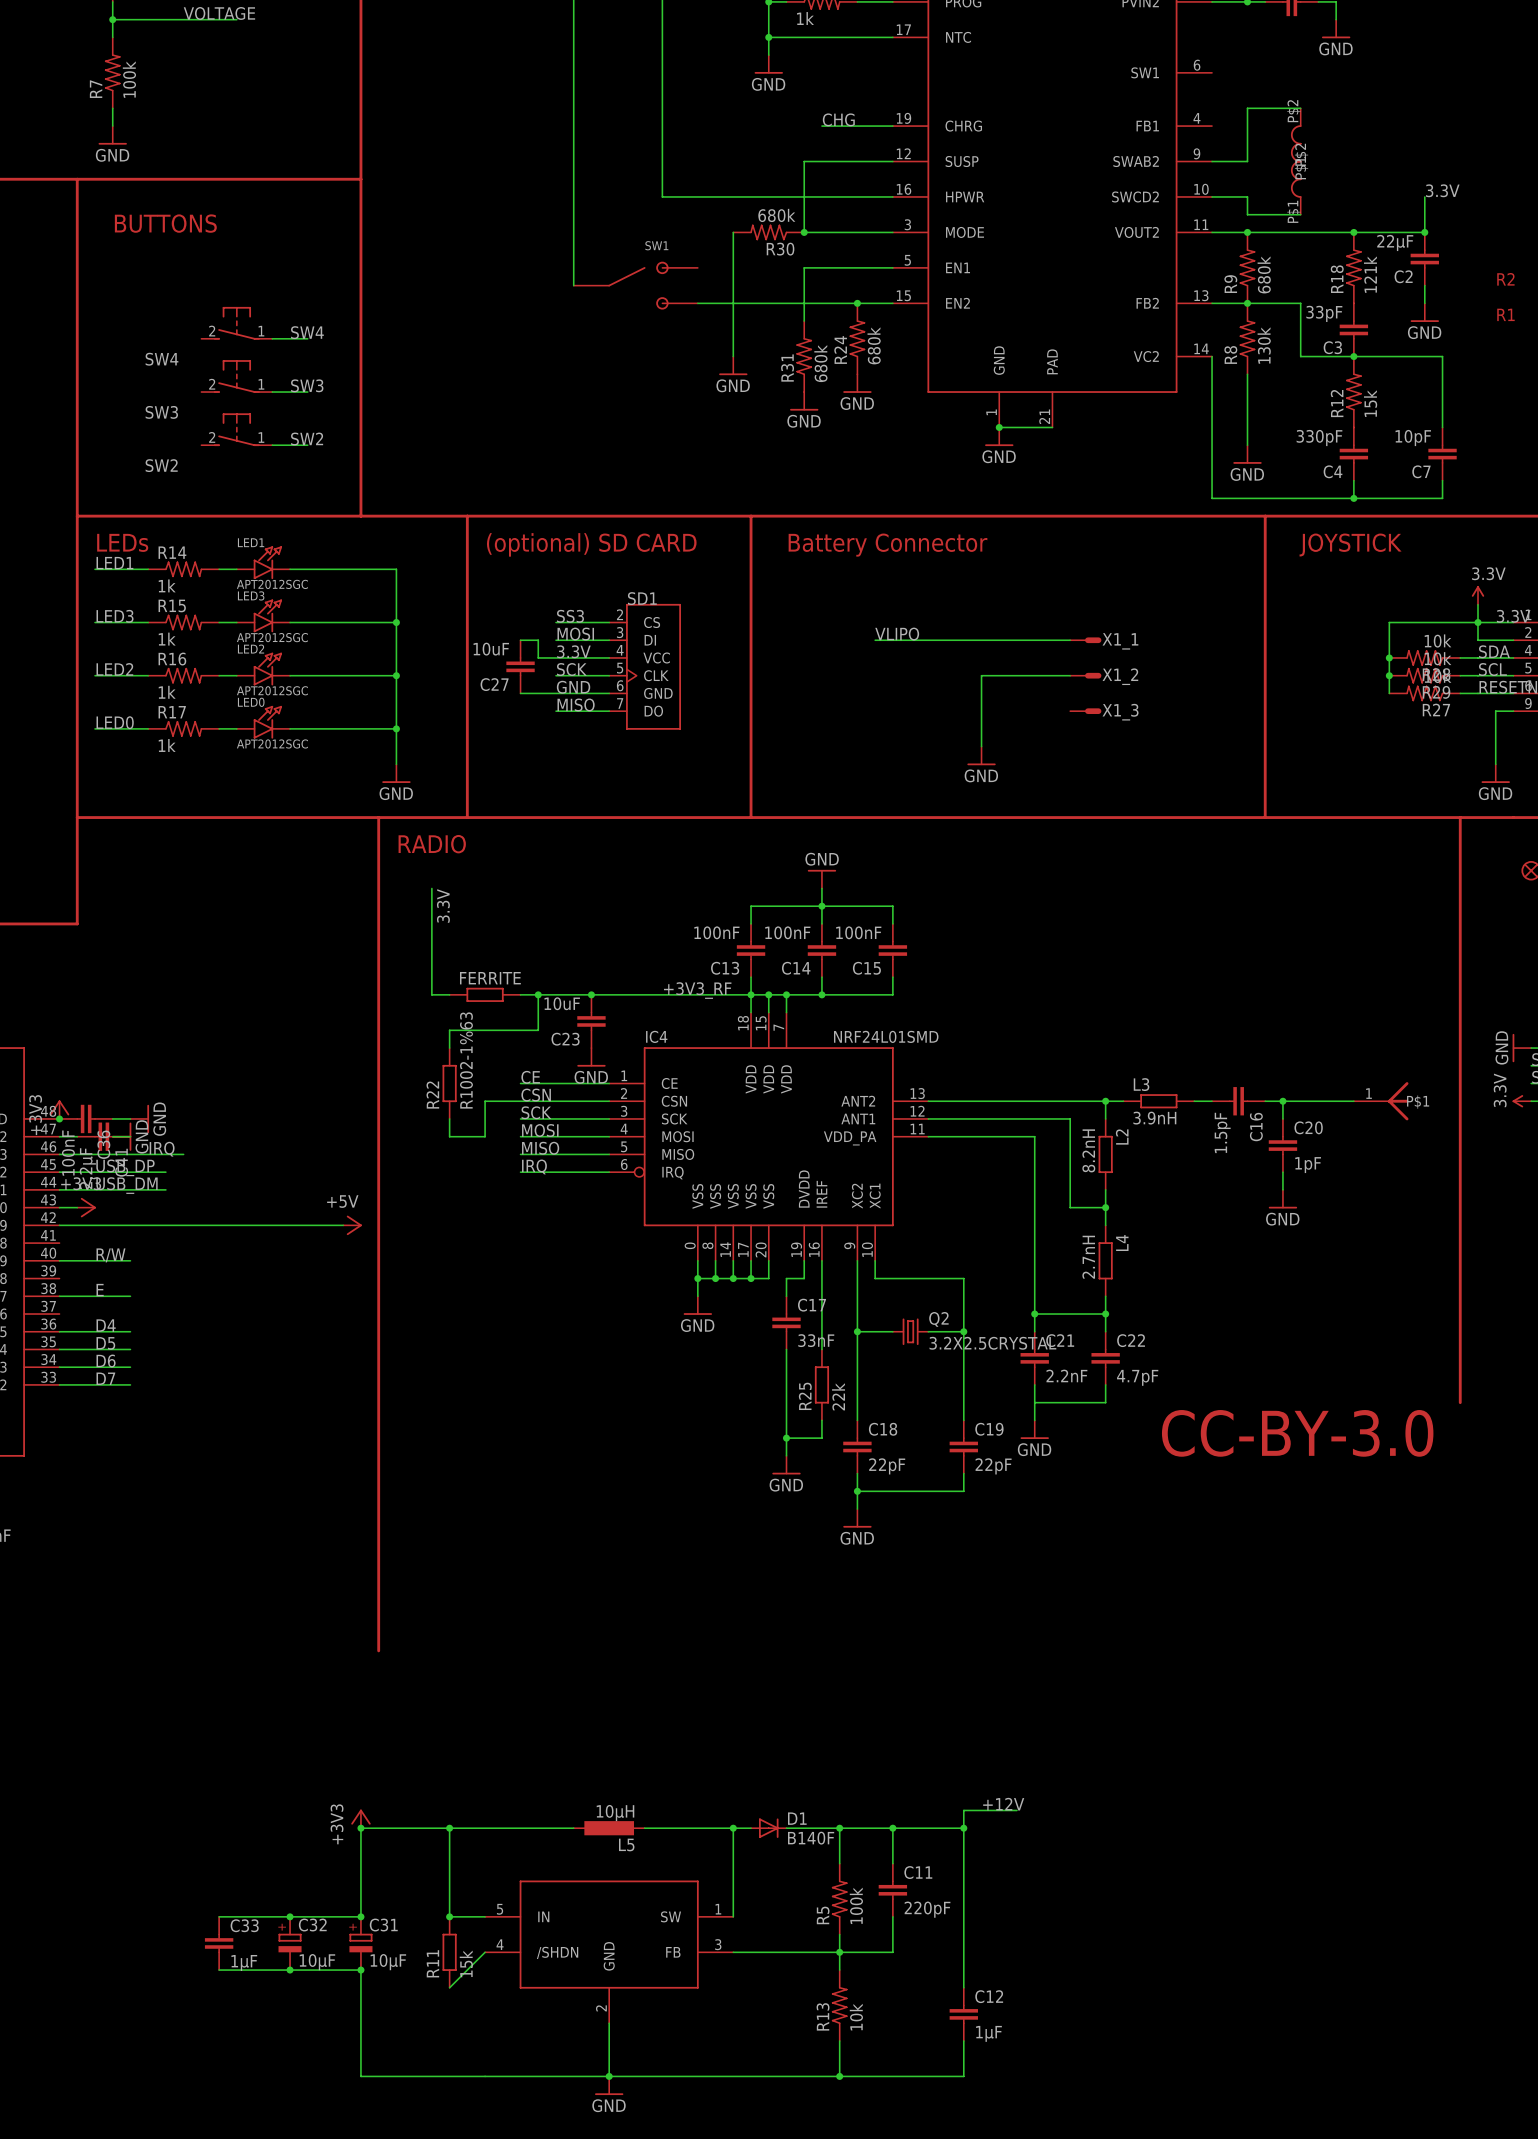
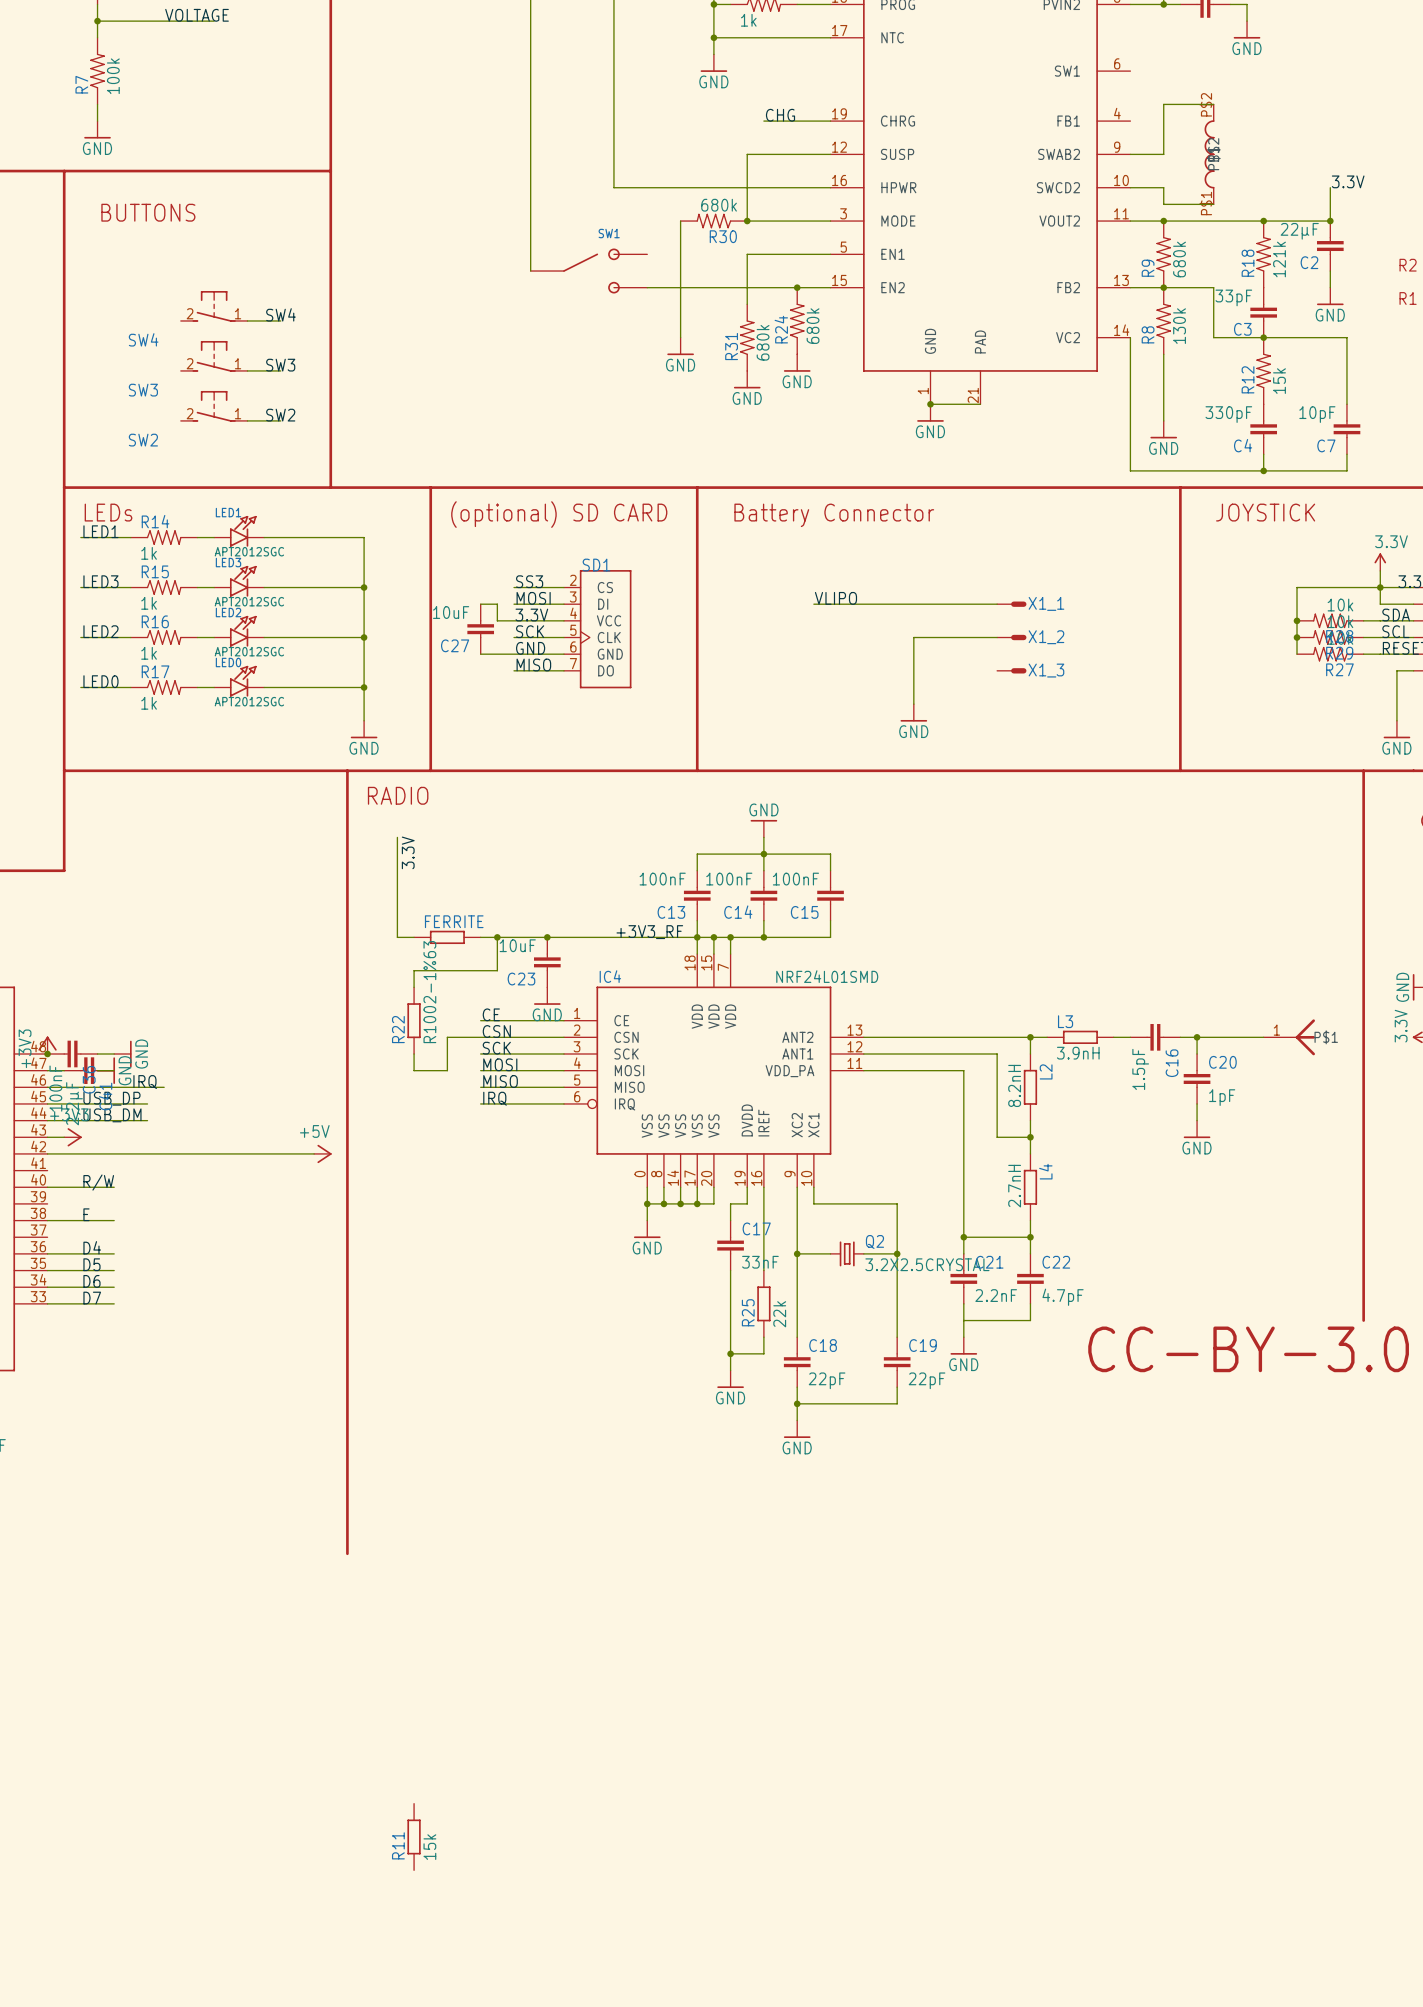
label: +12V (1003, 1804) -> none
wire: (1016, 1810) (963, 1810) (963, 1987) -> none
power symbol: +3V3 (360, 1818) -> none
junction: (360, 1828) -> none
wire: (449, 1828) (449, 1916) (485, 1916) -> none
junction: (449, 1828) -> none
wire: (573, 1828) (360, 1828) (360, 1916) (219, 1916) -> none
L5: 10µH (609, 1828) -> none
wire: (644, 1828) (751, 1828) -> none
wire: (733, 1828) (733, 1916) -> none
junction: (733, 1828) -> none
D1: B140F (768, 1828) -> none
wire: (786, 1828) (963, 1828) -> none
wire: (839, 1828) (839, 1863) -> none
junction: (839, 1828) -> none
wire: (892, 1828) (892, 1863) -> none
junction: (892, 1828) -> none
junction: (963, 1828) -> none
C11: 220pF (892, 1890) -> none
R5: 100k (839, 1899) -> none
junction: (290, 1916) -> none
junction: (360, 1916) -> none
junction: (449, 1916) -> none
wire: (892, 1916) (892, 1952) (733, 1952) -> none
wire: (839, 1934) (839, 1970) -> none
C33: 1µF (219, 1943) -> none
C32: 10µF (290, 1943) -> none
C31: 10µF (360, 1943) -> none
part: (609, 1951) -> none
wire: (485, 1952) (449, 1987) -> none
junction: (839, 1952) -> none
wire: (219, 1970) (360, 1970) (360, 2076) (963, 2076) (963, 2040) -> none
junction: (290, 1970) -> none
junction: (360, 1970) -> none
R13: 10k (839, 2005) -> none
C12: 1µF (963, 2014) -> none
wire: (609, 2023) (609, 2076) -> none
wire: (839, 2040) (839, 2076) -> none
junction: (609, 2076) -> none
junction: (839, 2076) -> none
power symbol: GND (609, 2085) -> none

